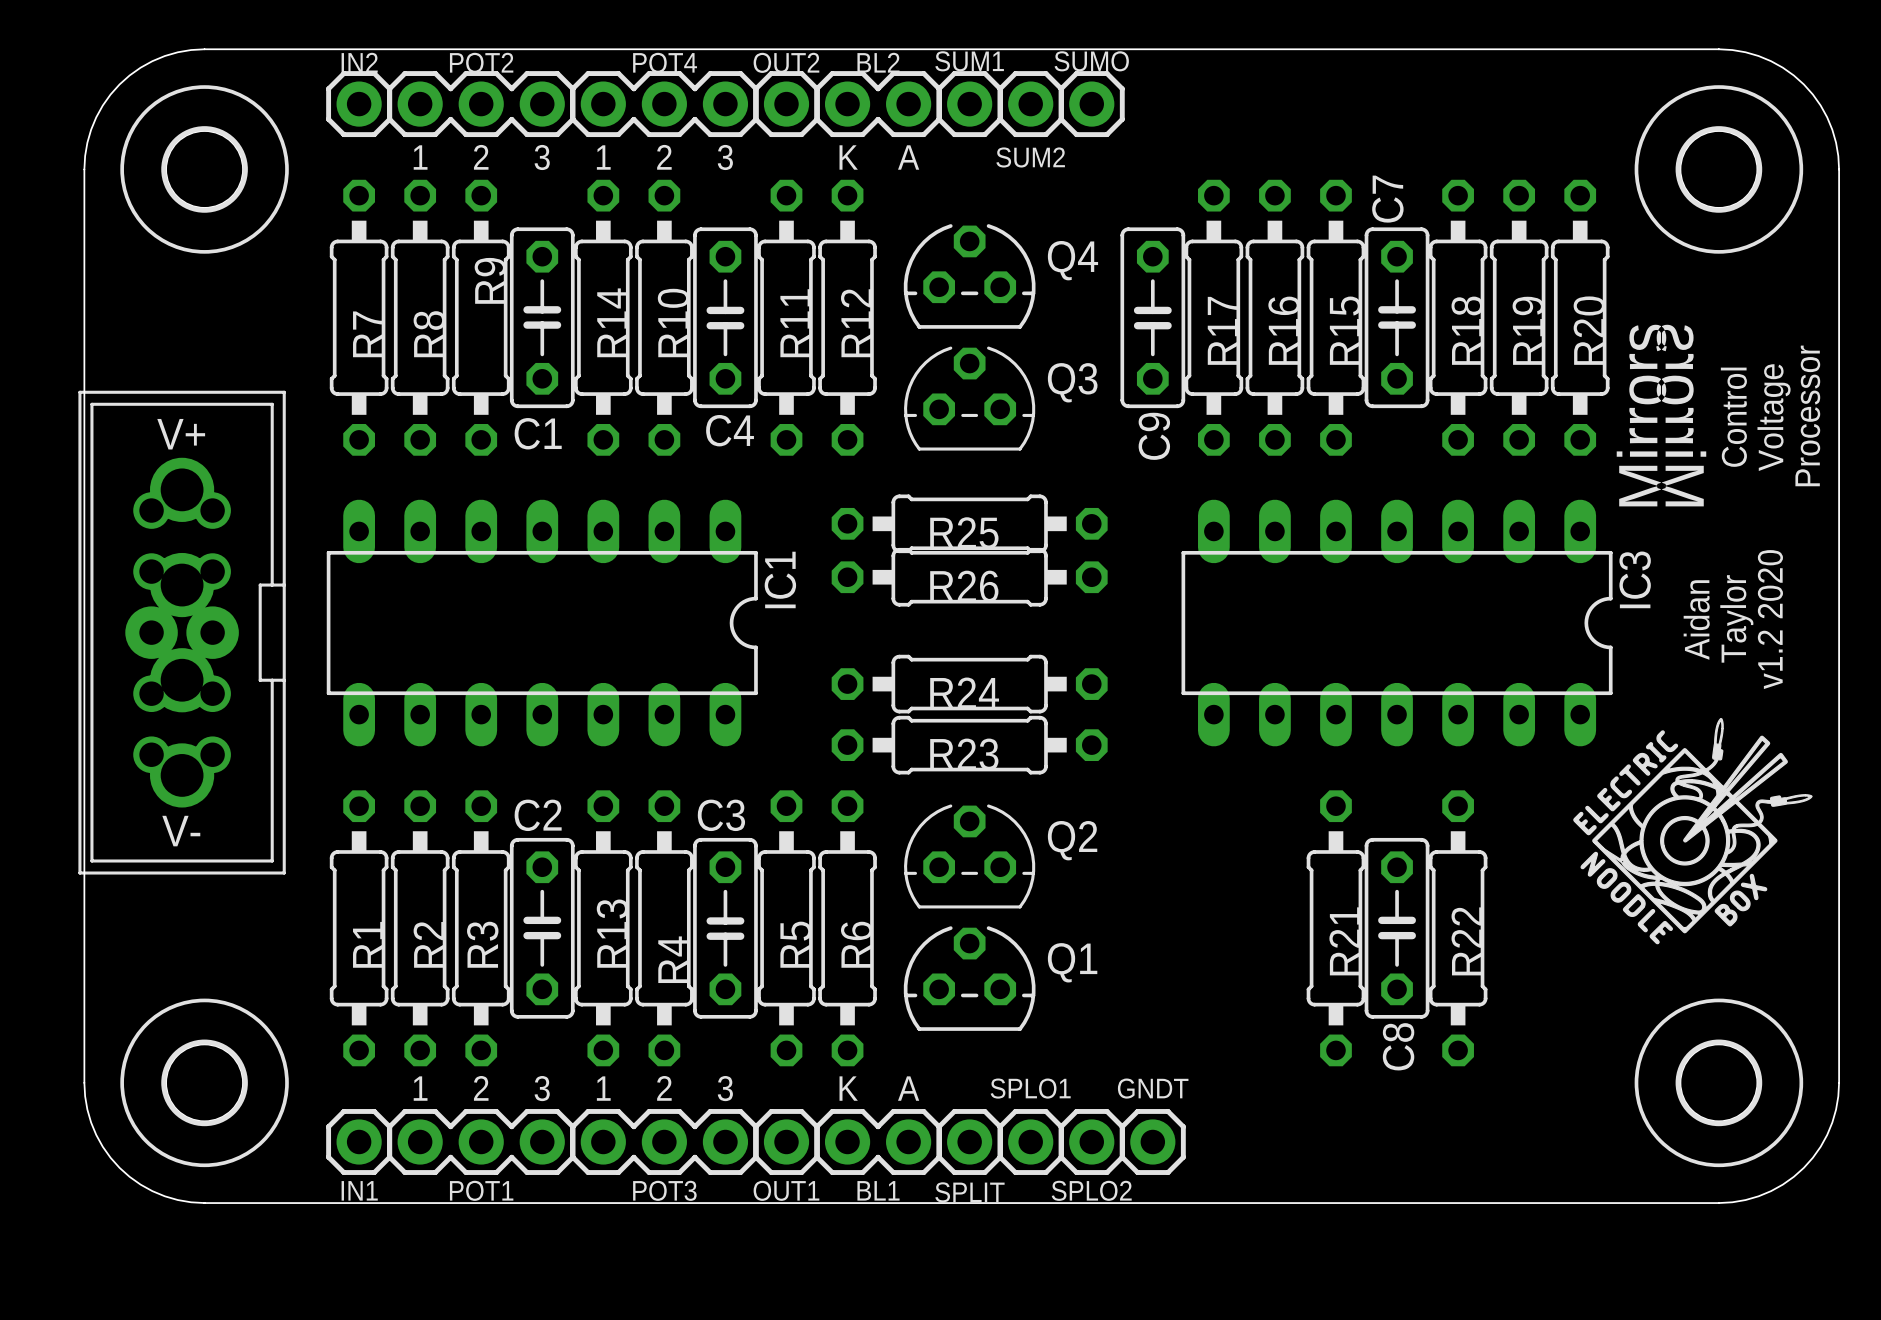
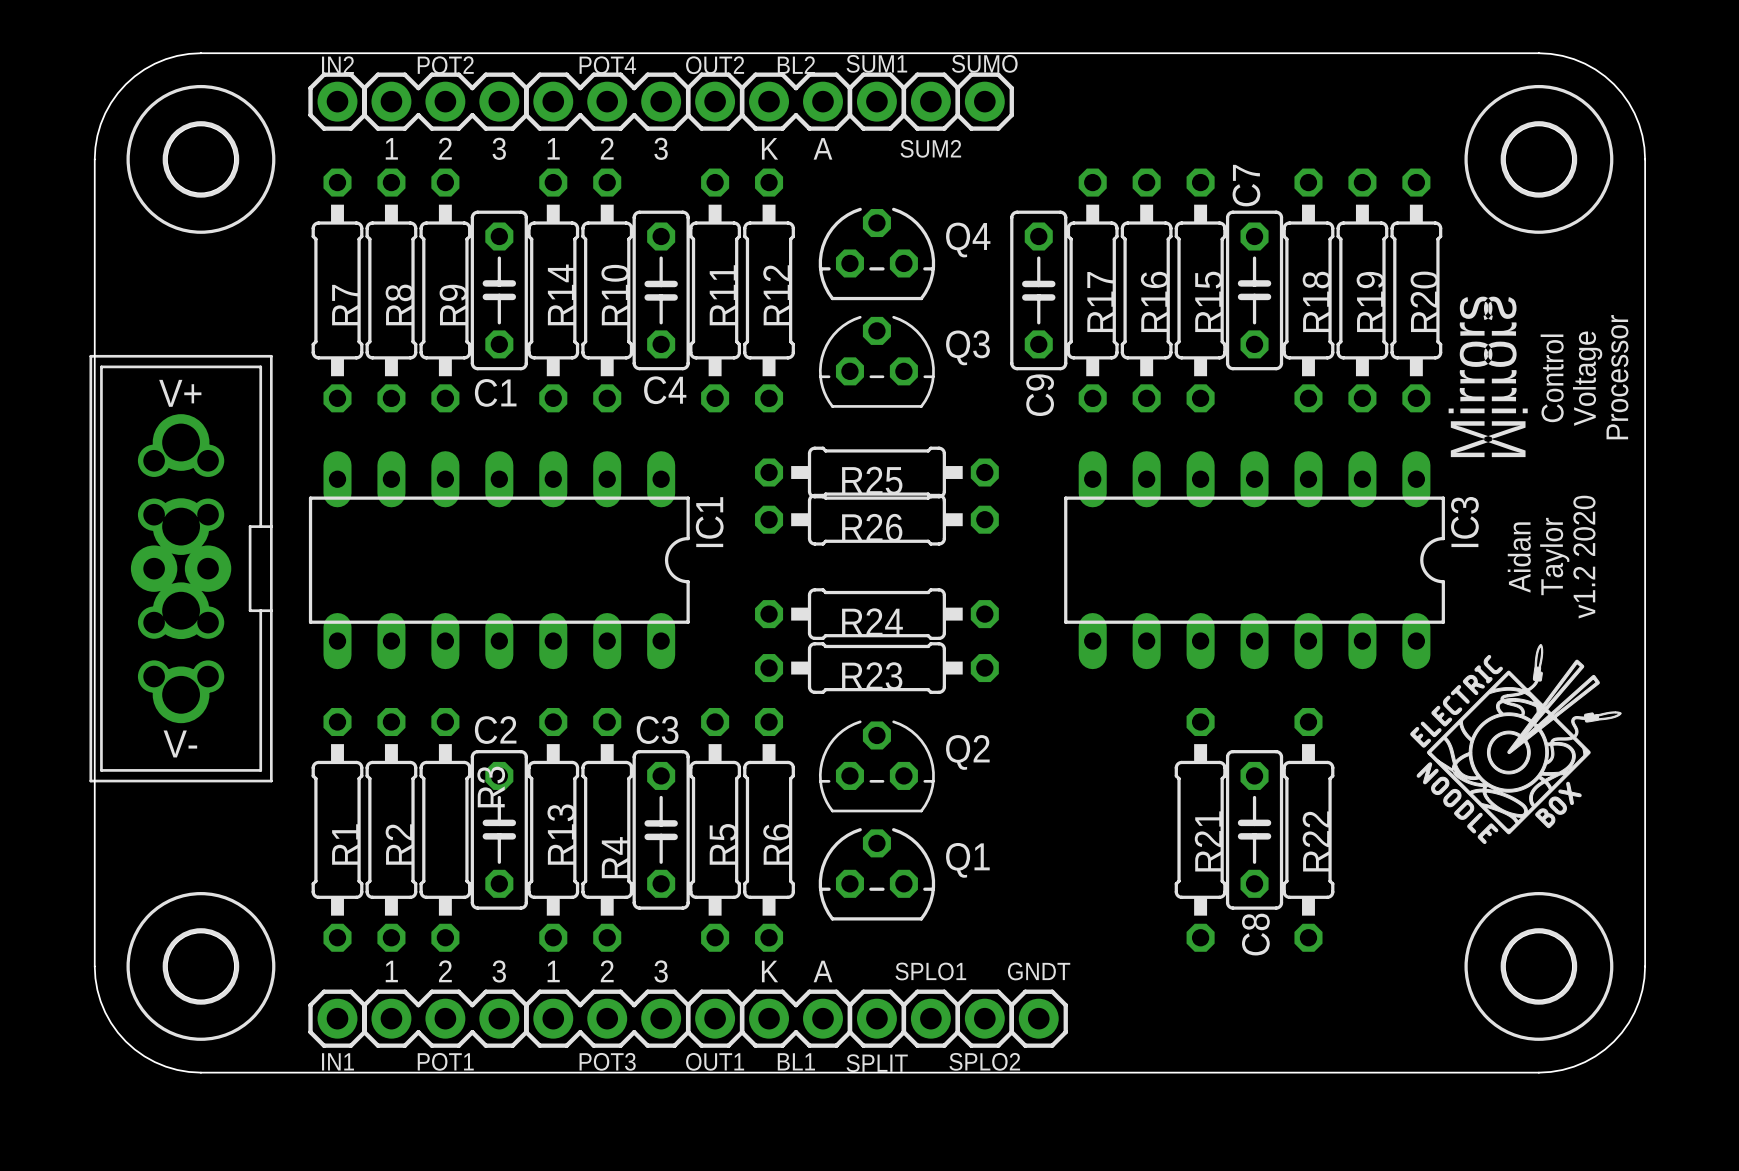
R9 name position: R9 (490, 280) -> R9 (453, 305)
R3 name position: R3 (482, 944) -> R3 (491, 787)

